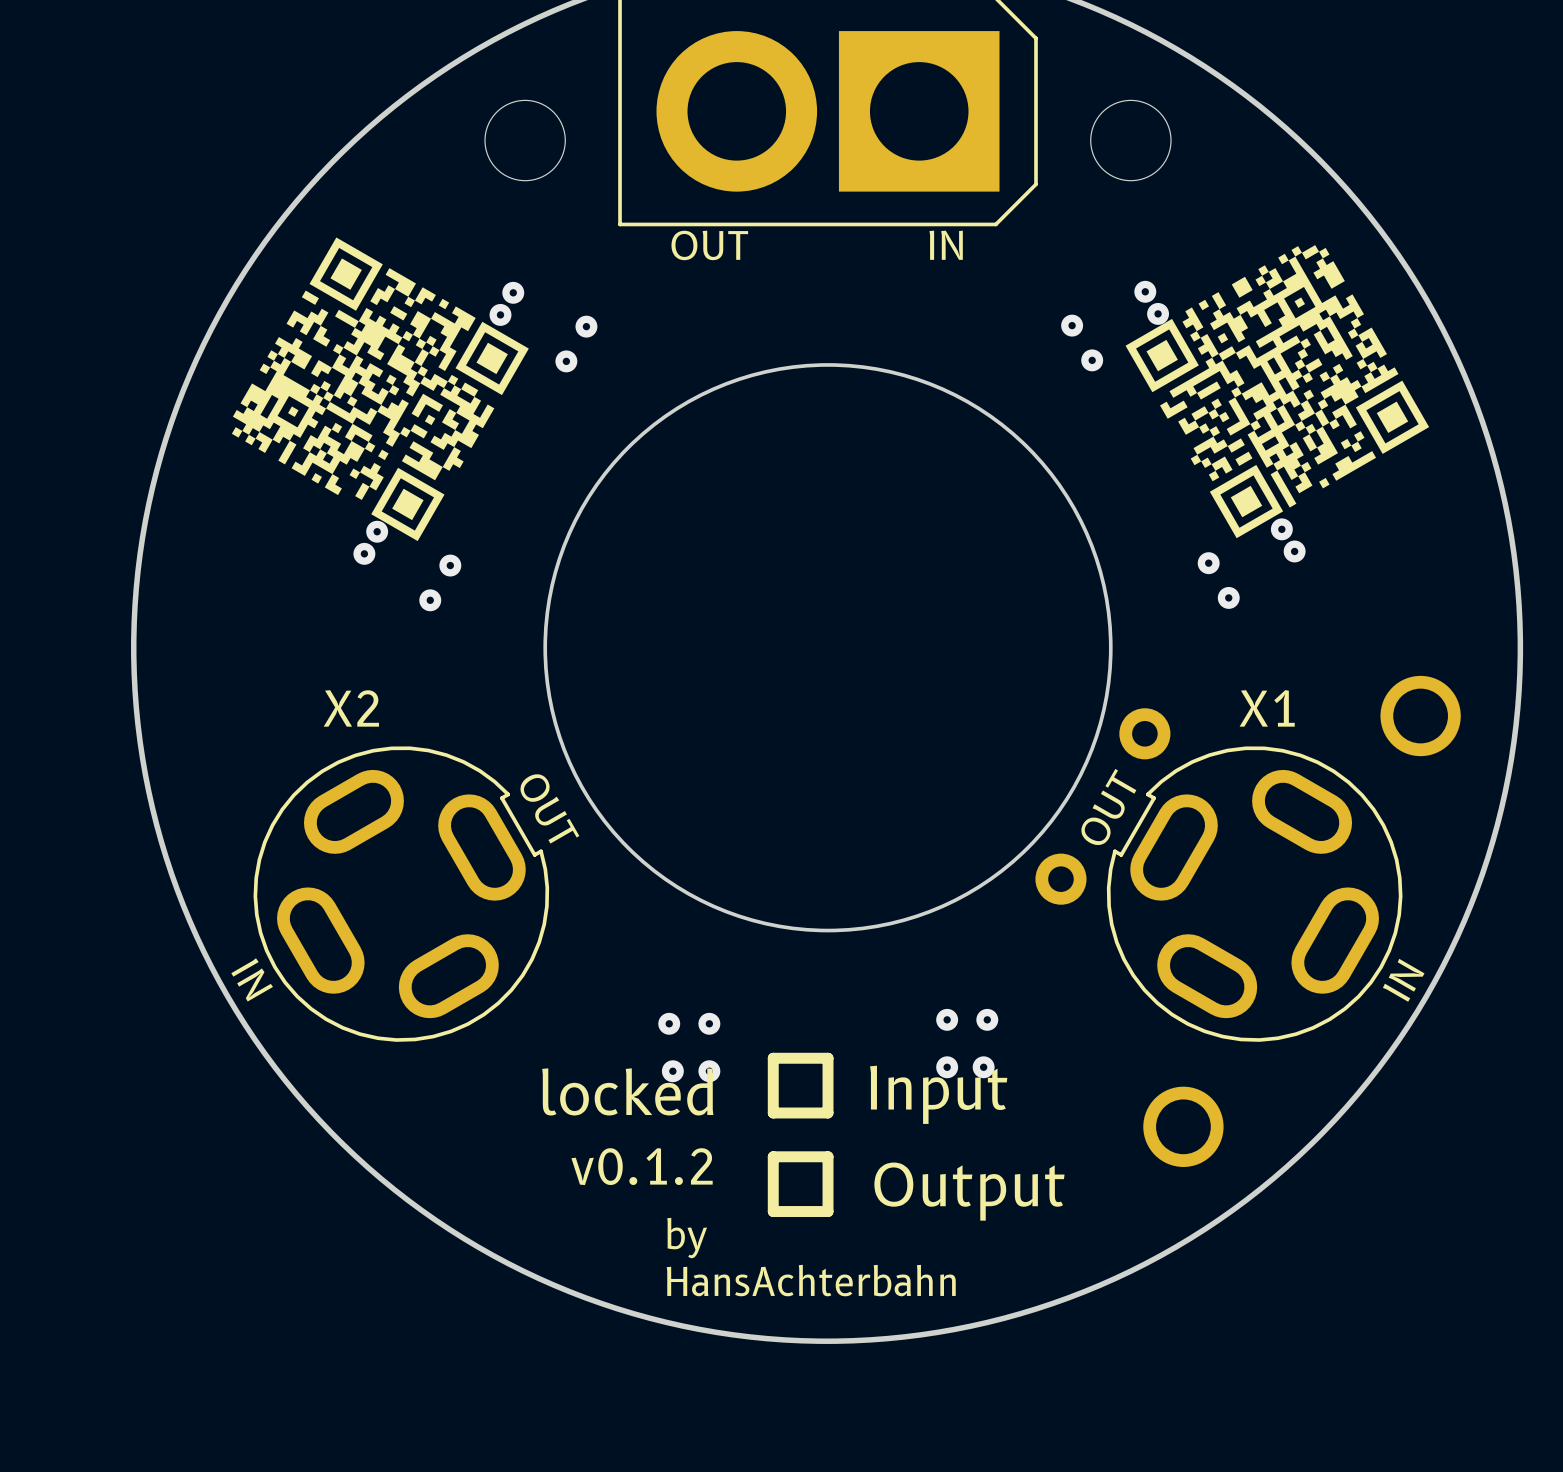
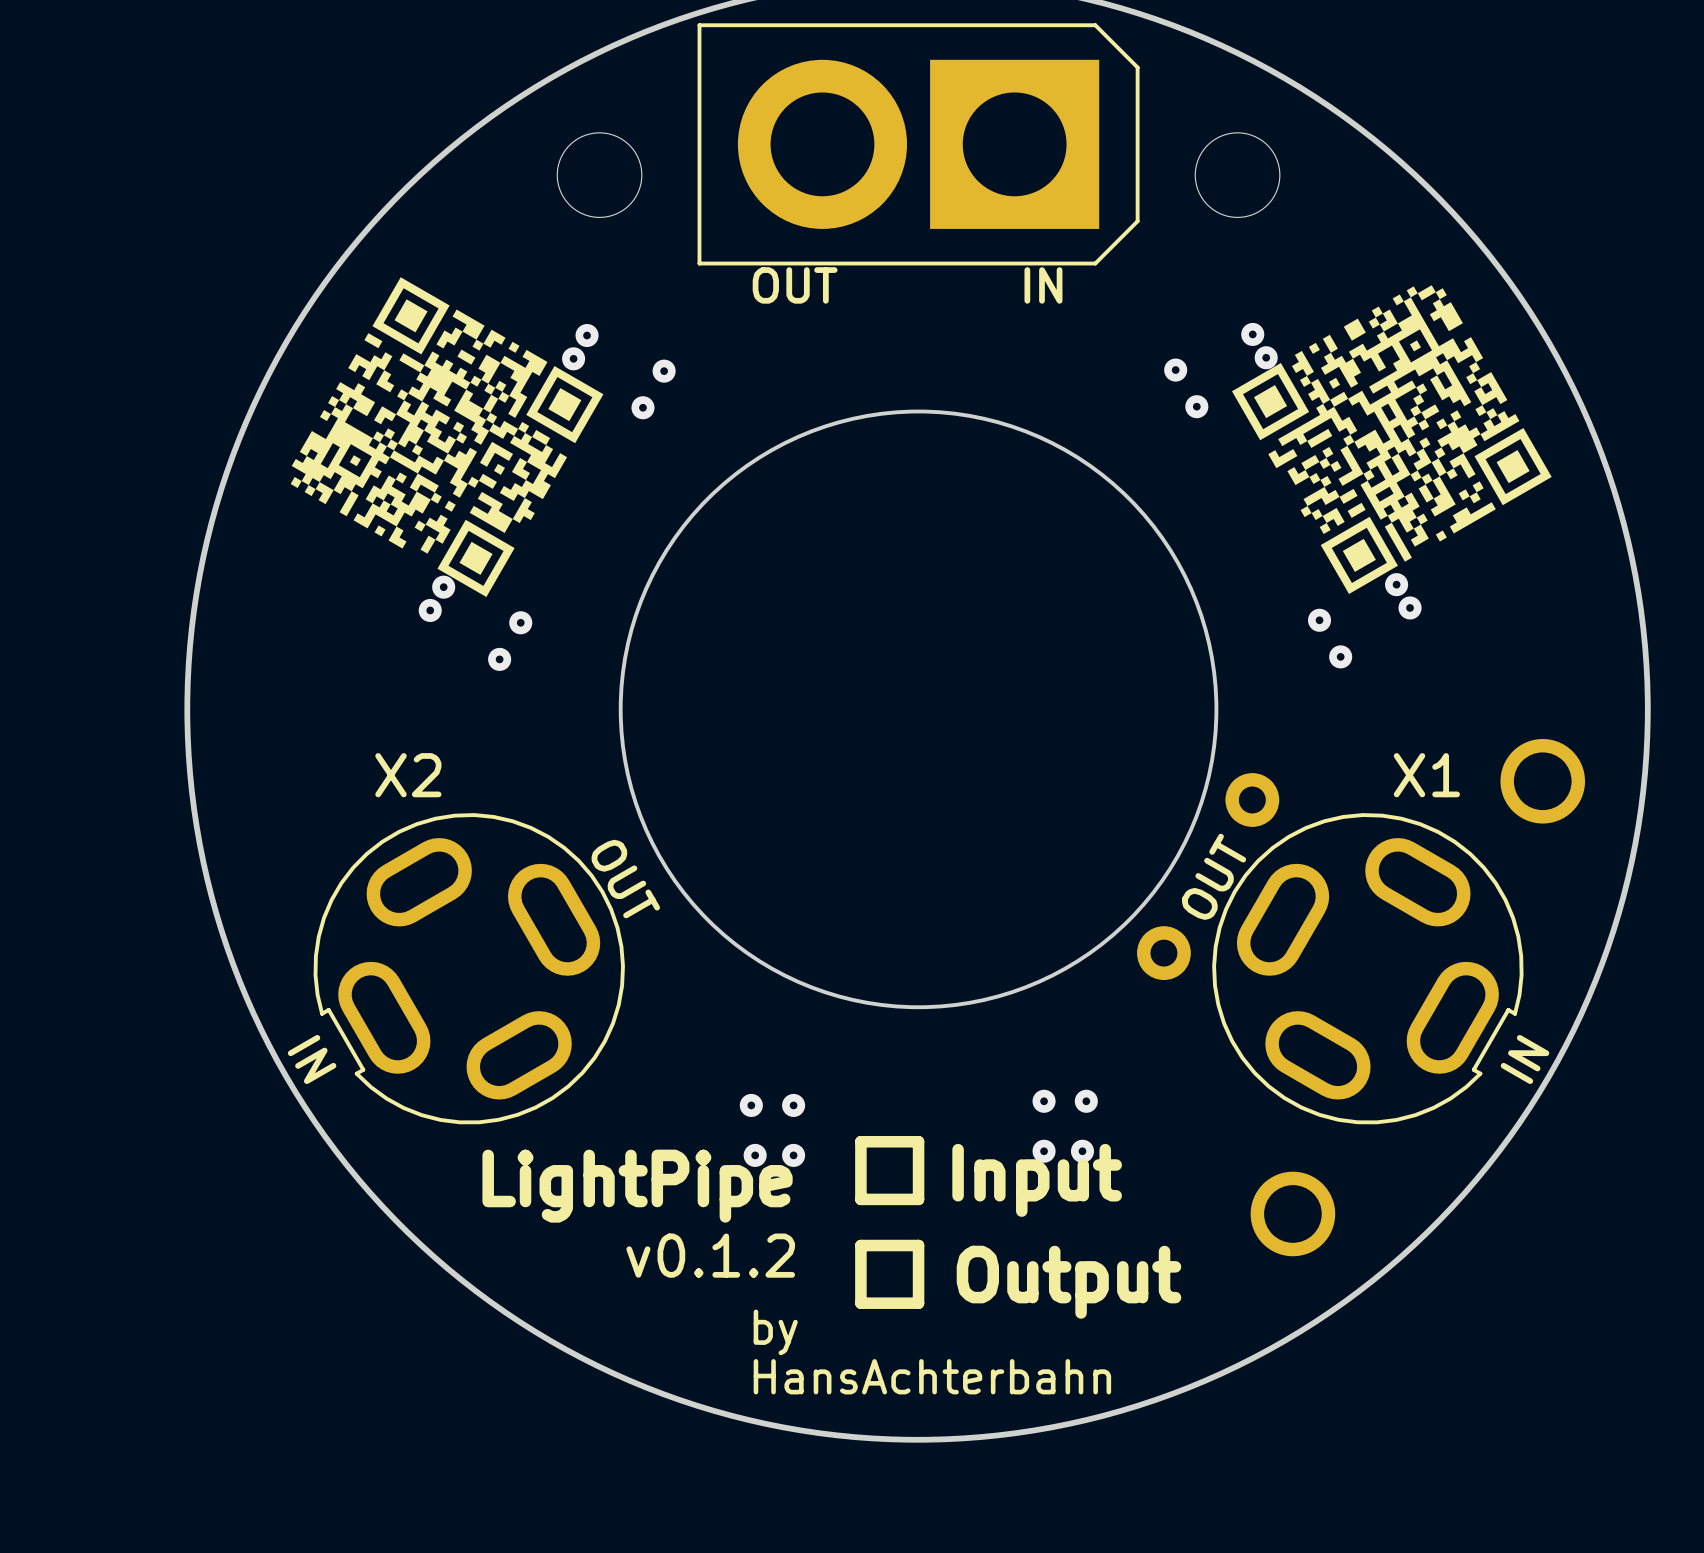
X2 rotation: 0° (401, 894) -> 180° (469, 968)
X1 rotation: 0° (1254, 894) -> 180° (1367, 968)
text: locked (627, 1091) -> LightPipe (637, 1186)

